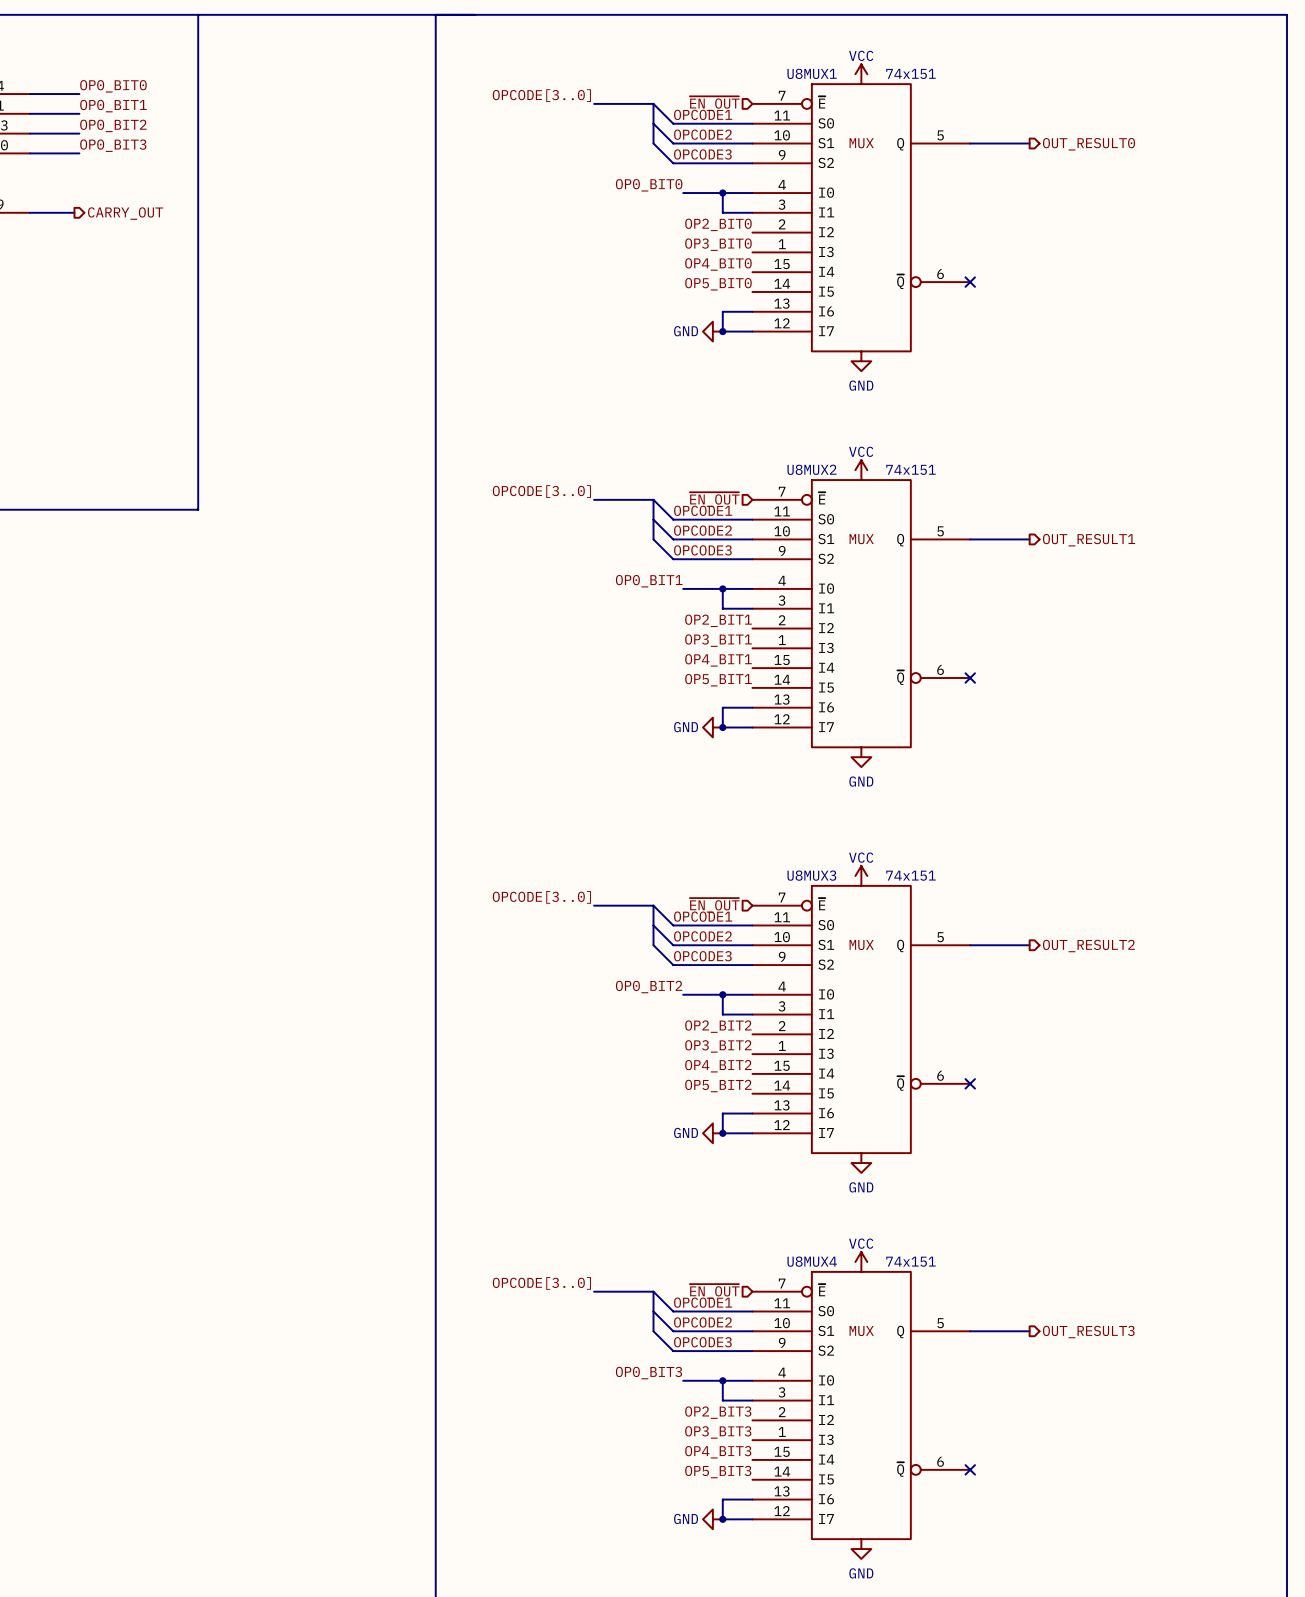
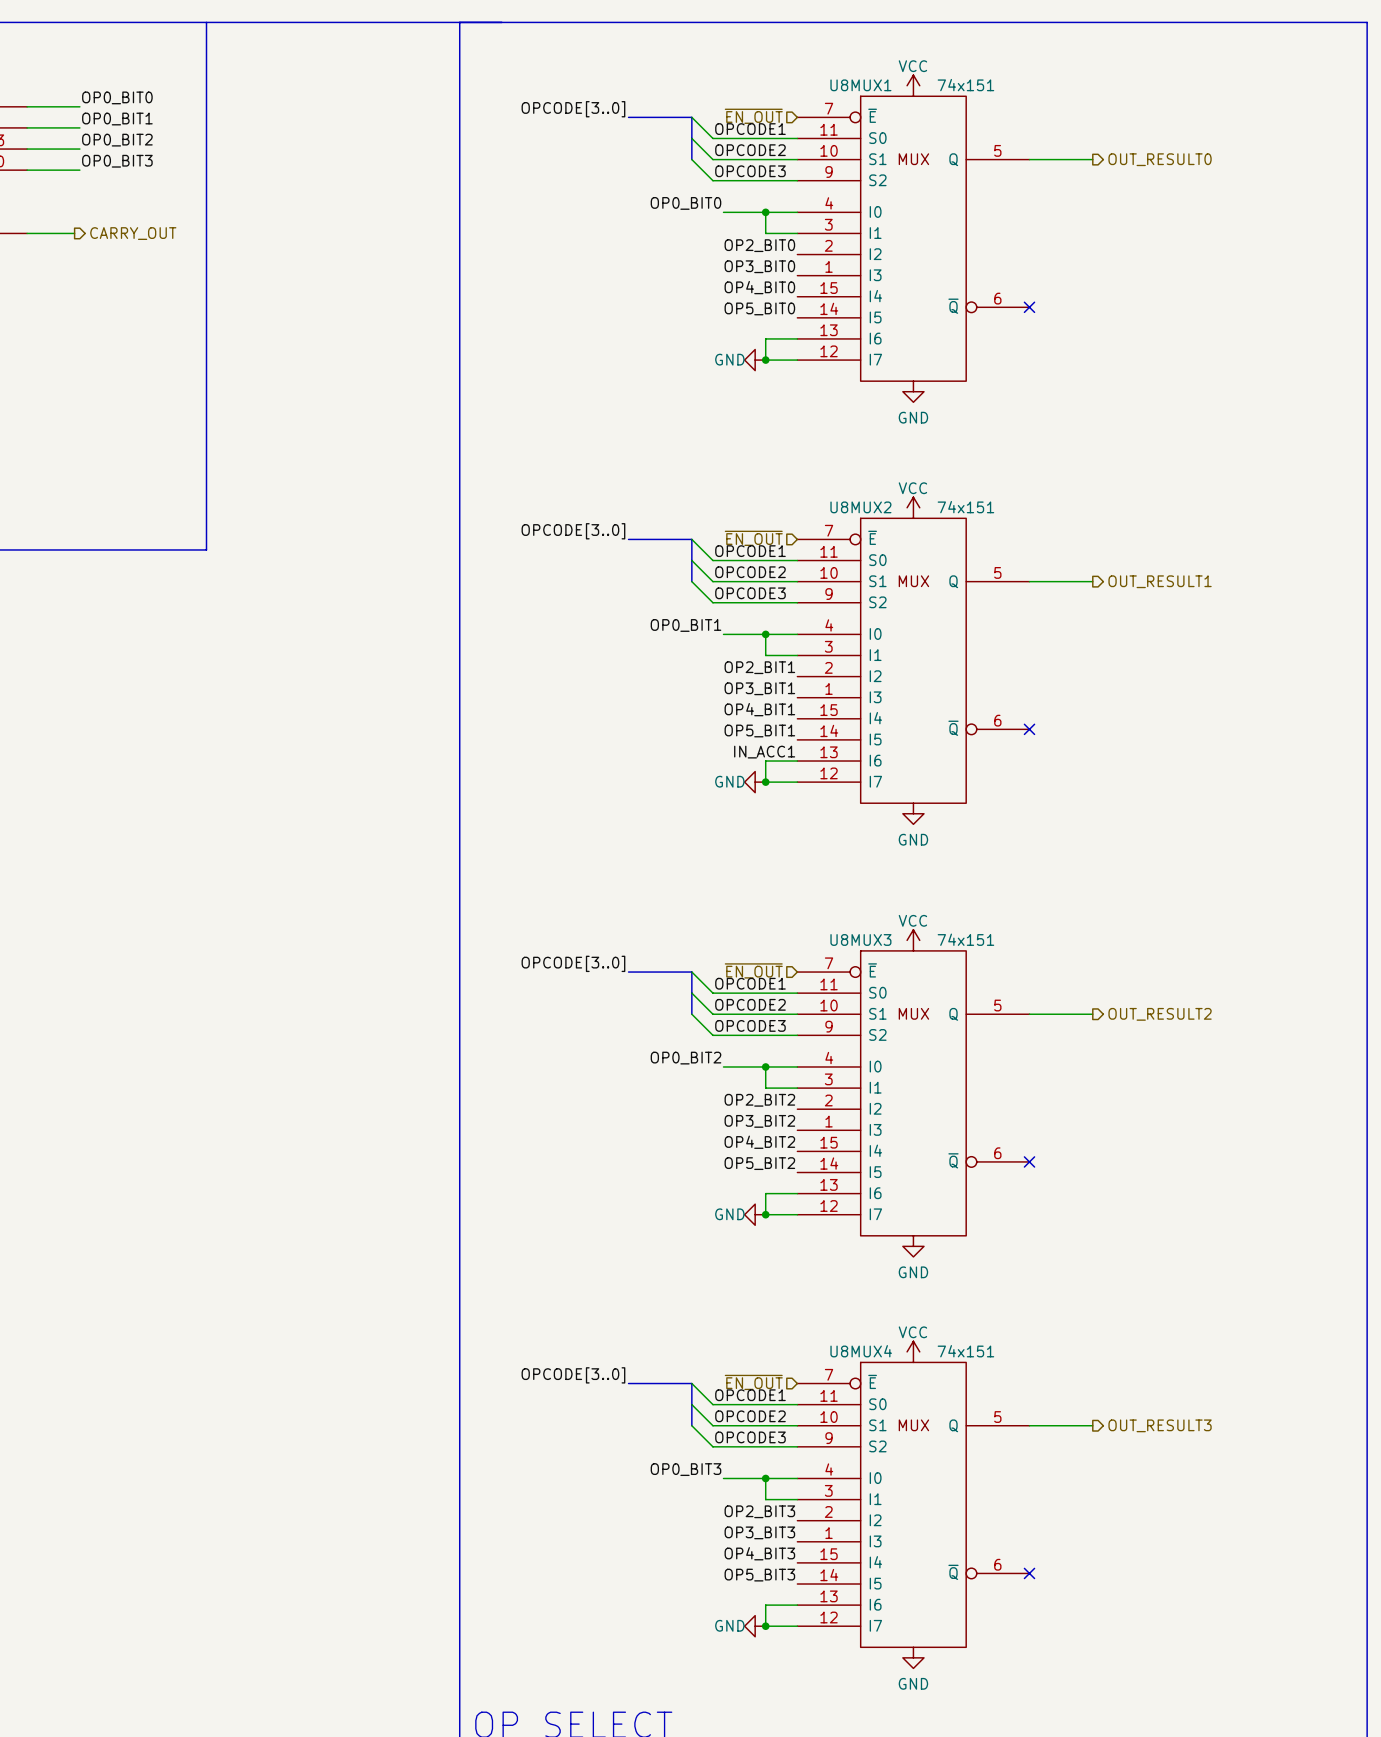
label: none -> IN_ACC1 (764, 752)

